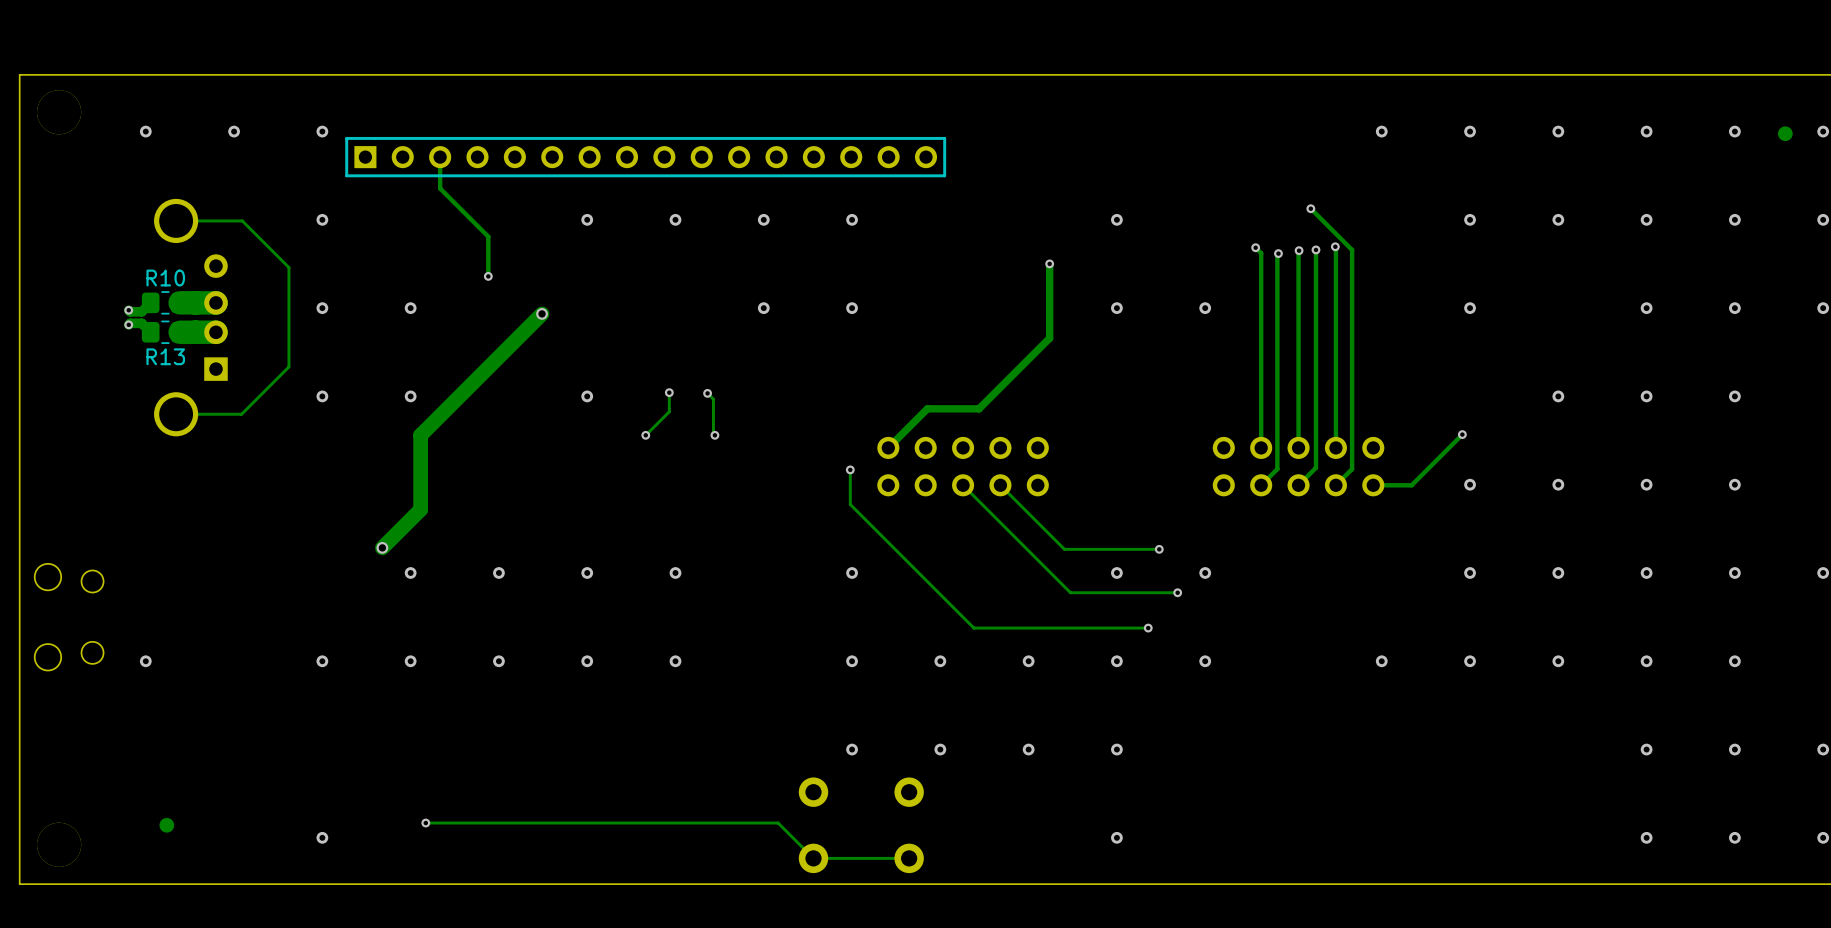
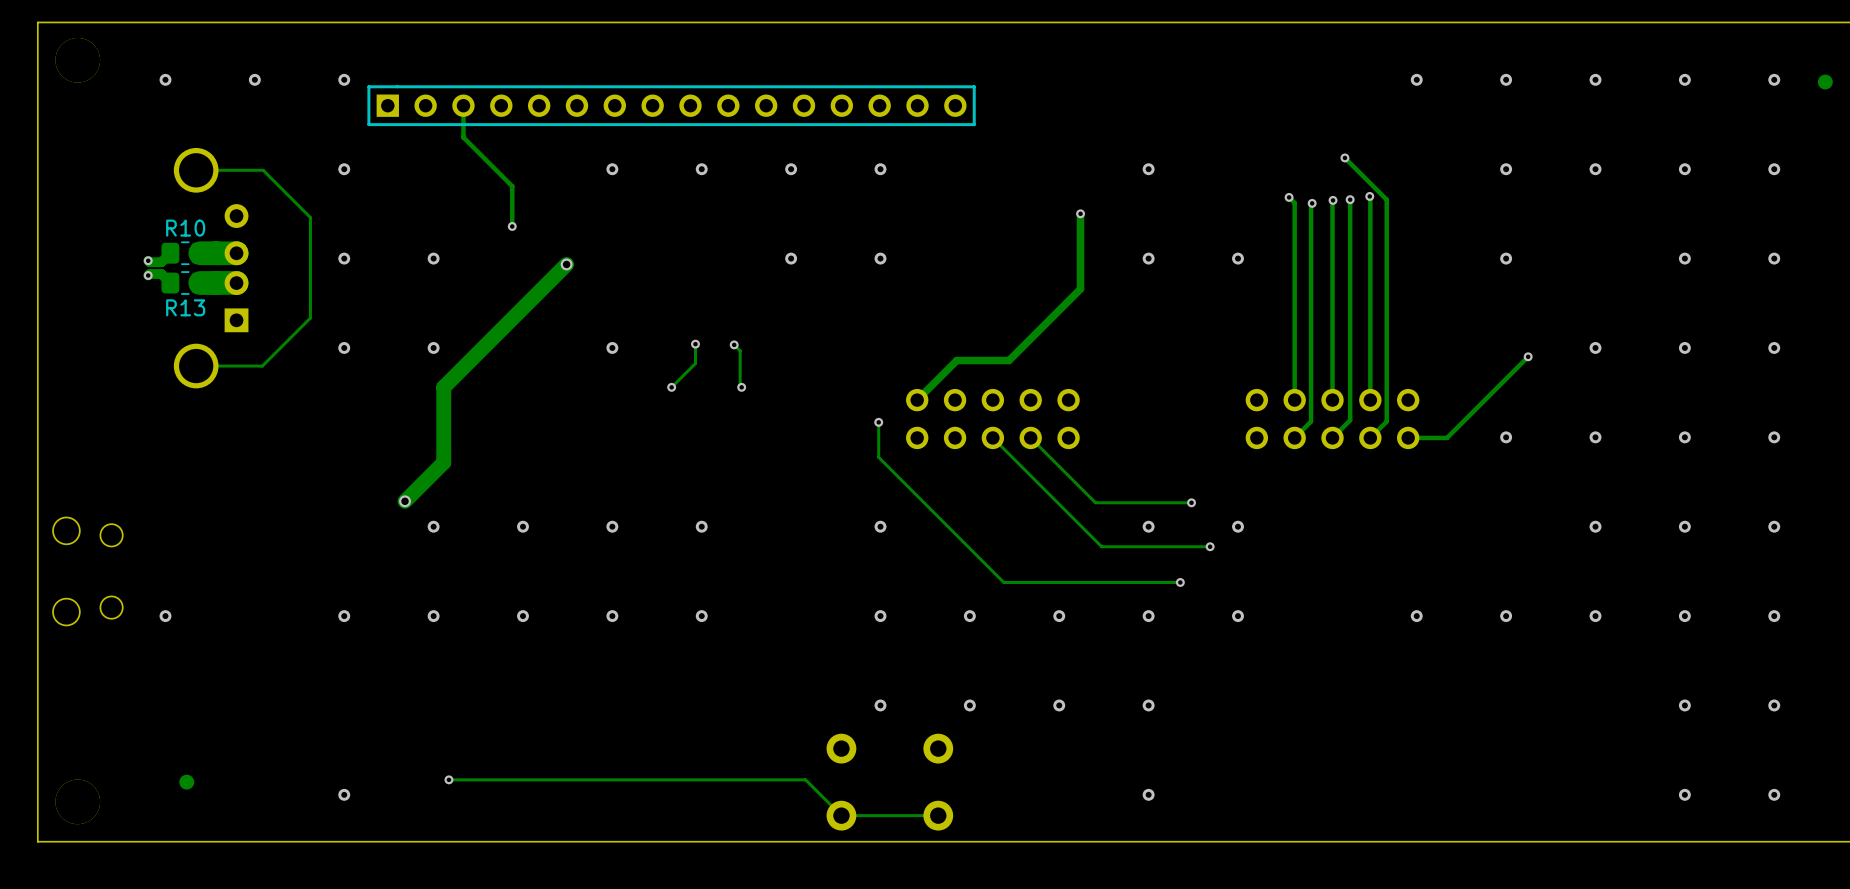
track: none -> (1528, 356) (1498, 386)
via position: (1462, 434) -> (1528, 356)
via: (1470, 572) -> none

